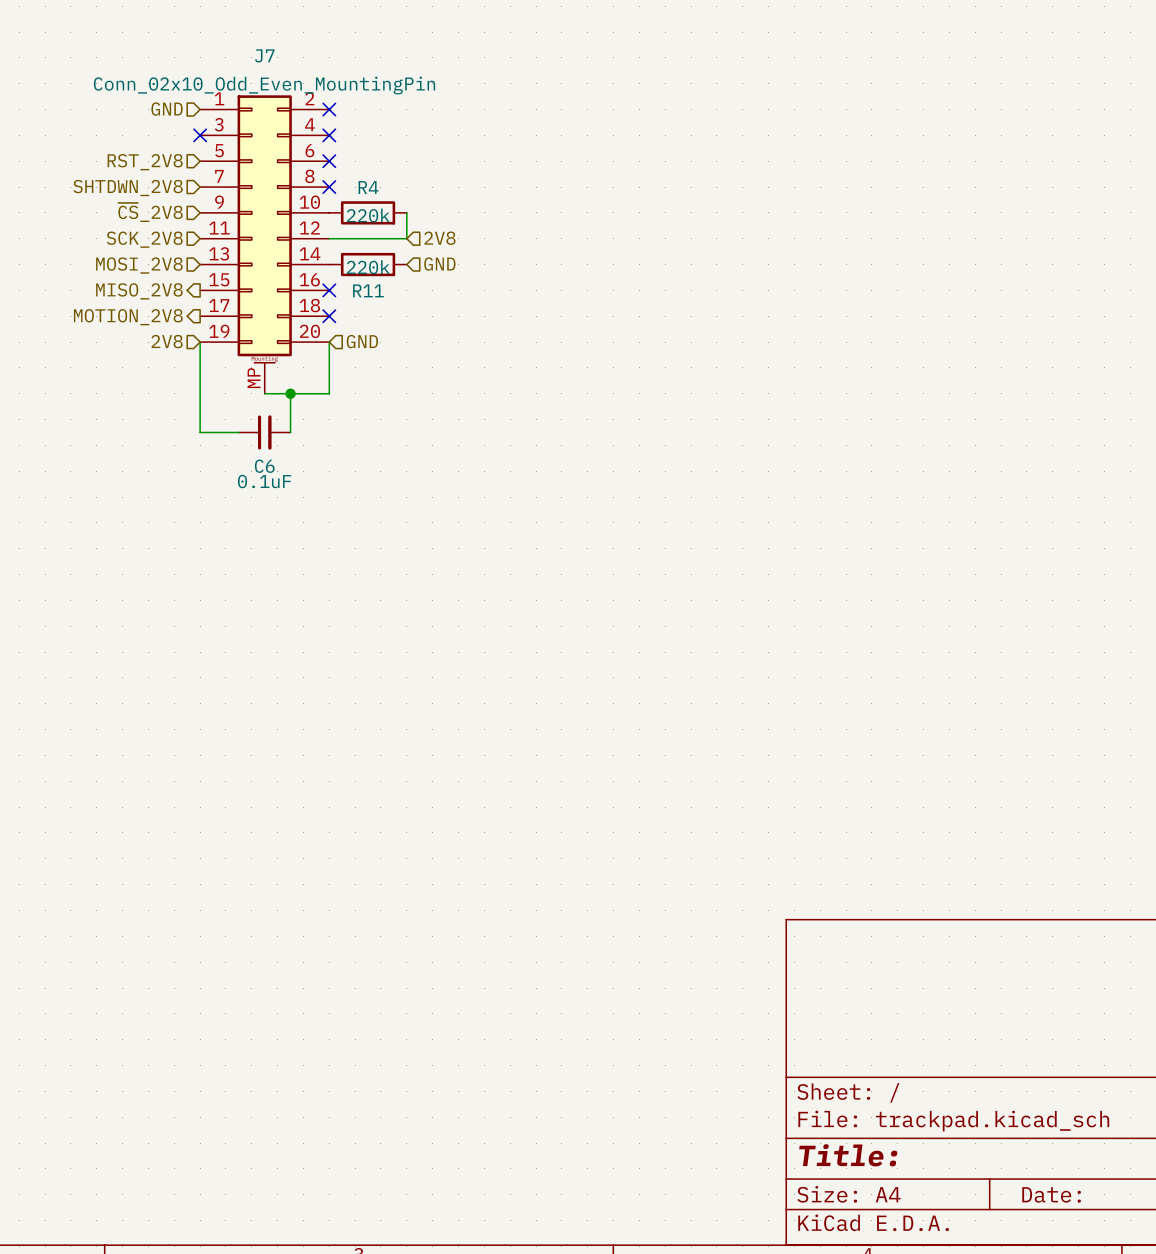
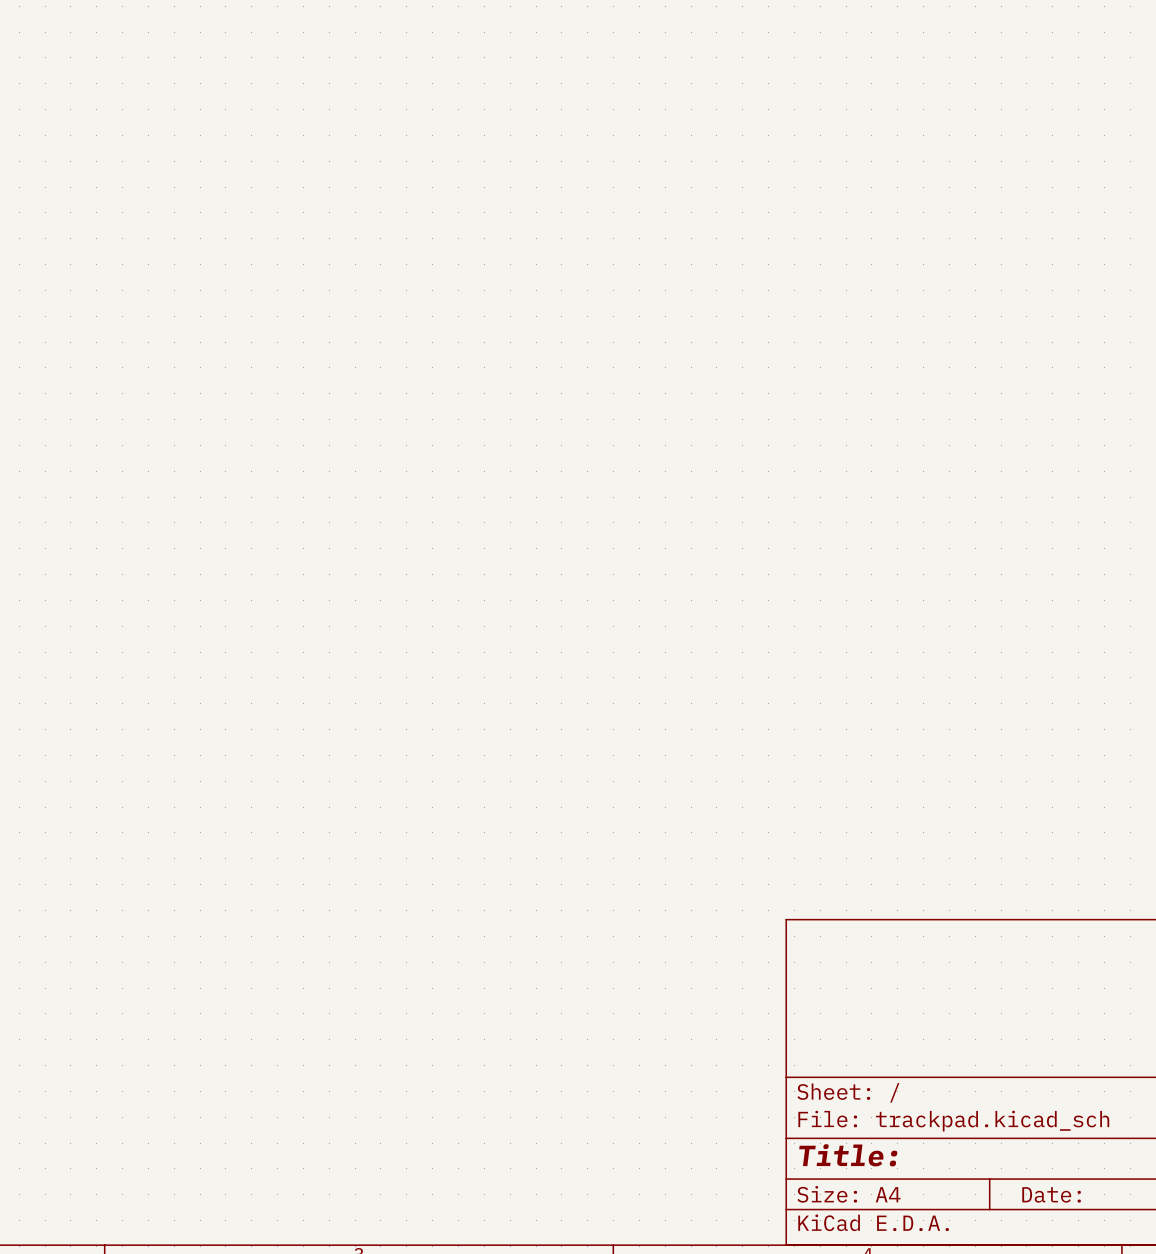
hierarchical label: GND (167, 109) -> none
no-connect mark: (329, 109) -> none
no-connect mark: (200, 135) -> none
no-connect mark: (329, 135) -> none
no-connect mark: (329, 161) -> none
hierarchical label: RST_2V8 (145, 162) -> none
no-connect mark: (329, 187) -> none
hierarchical label: SHTDWN_2V8 (128, 188) -> none
hierarchical label: ~{CS}_2V8 (150, 212) -> none
R4: 220k (368, 212) -> none
wire: (406, 212) (406, 238) (329, 238) -> none
hierarchical label: 2V8 (439, 238) -> none
hierarchical label: SCK_2V8 (144, 239) -> none
J7: Conn_02x10_Odd_Even_MountingPin (264, 244) -> none
R11: 220k (368, 264) -> none
hierarchical label: GND (439, 264) -> none
hierarchical label: MOSI_2V8 (139, 265) -> none
no-connect mark: (329, 290) -> none
hierarchical label: MISO_2V8 (139, 291) -> none
no-connect mark: (329, 316) -> none
hierarchical label: MOTION_2V8 (128, 317) -> none
hierarchical label: 2V8 (167, 341) -> none
hierarchical label: GND (362, 341) -> none
wire: (200, 342) (200, 432) (238, 432) -> none
wire: (329, 342) (329, 393) (264, 393) -> none
wire: (290, 393) (290, 432) -> none
junction: (290, 393) -> none
C6: 0.1uF (264, 432) -> none

